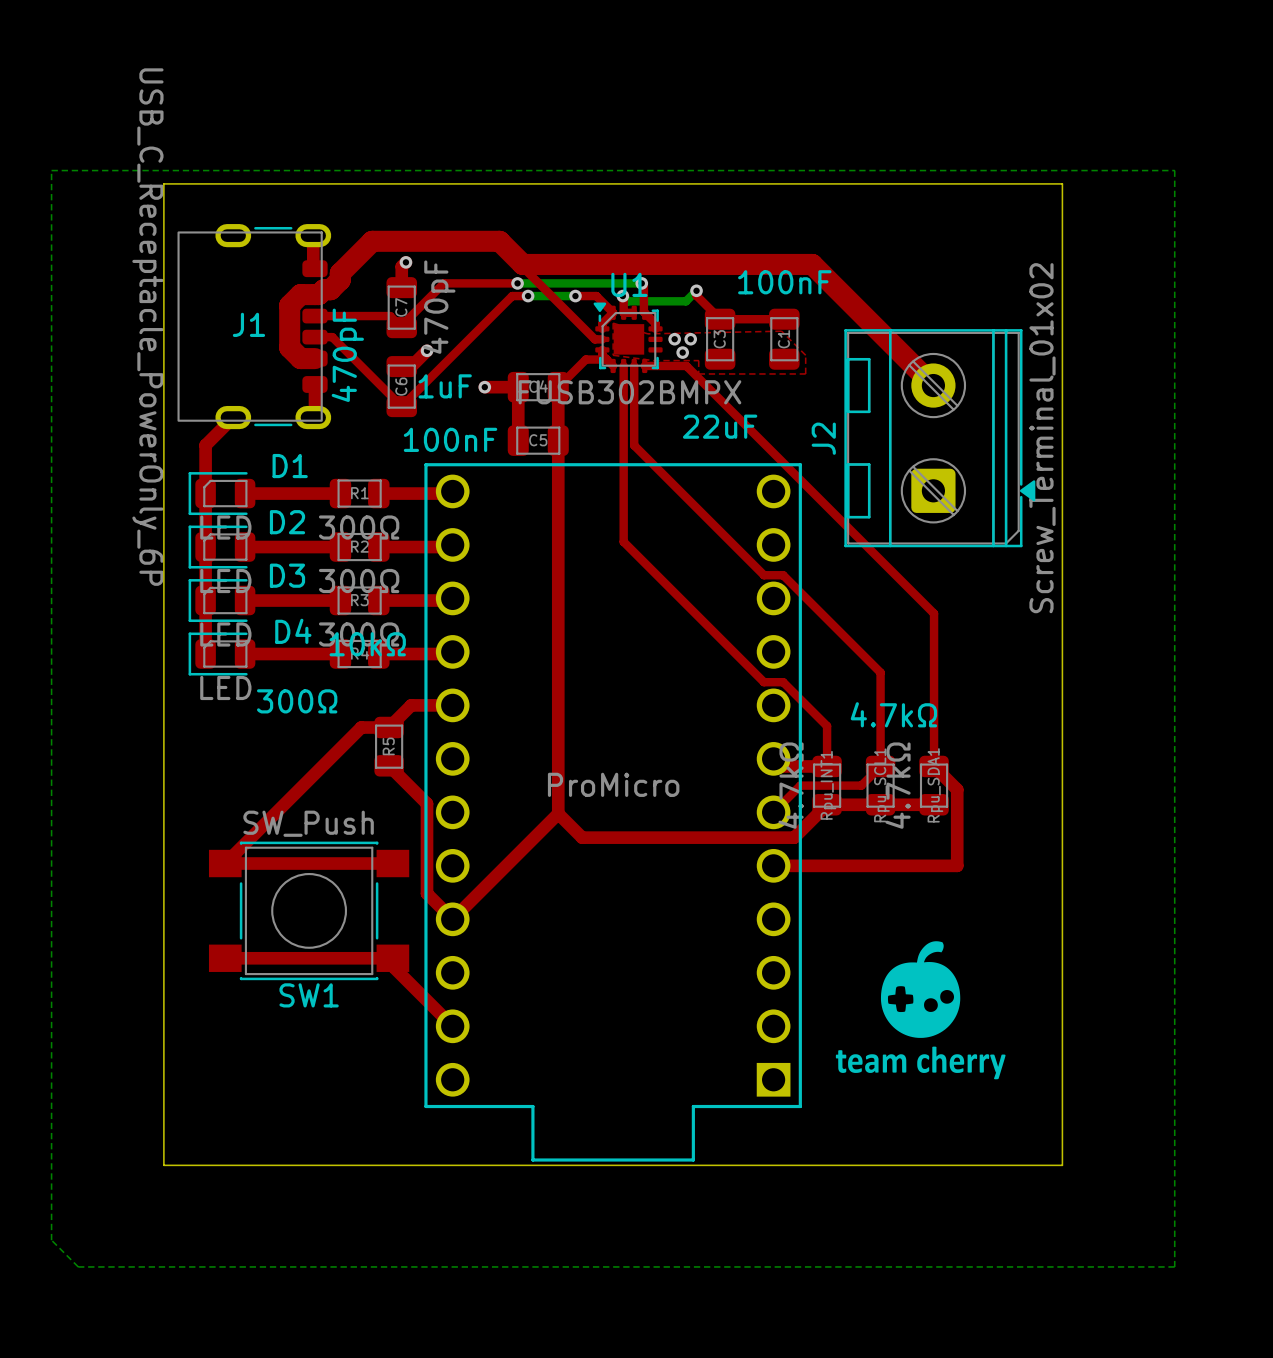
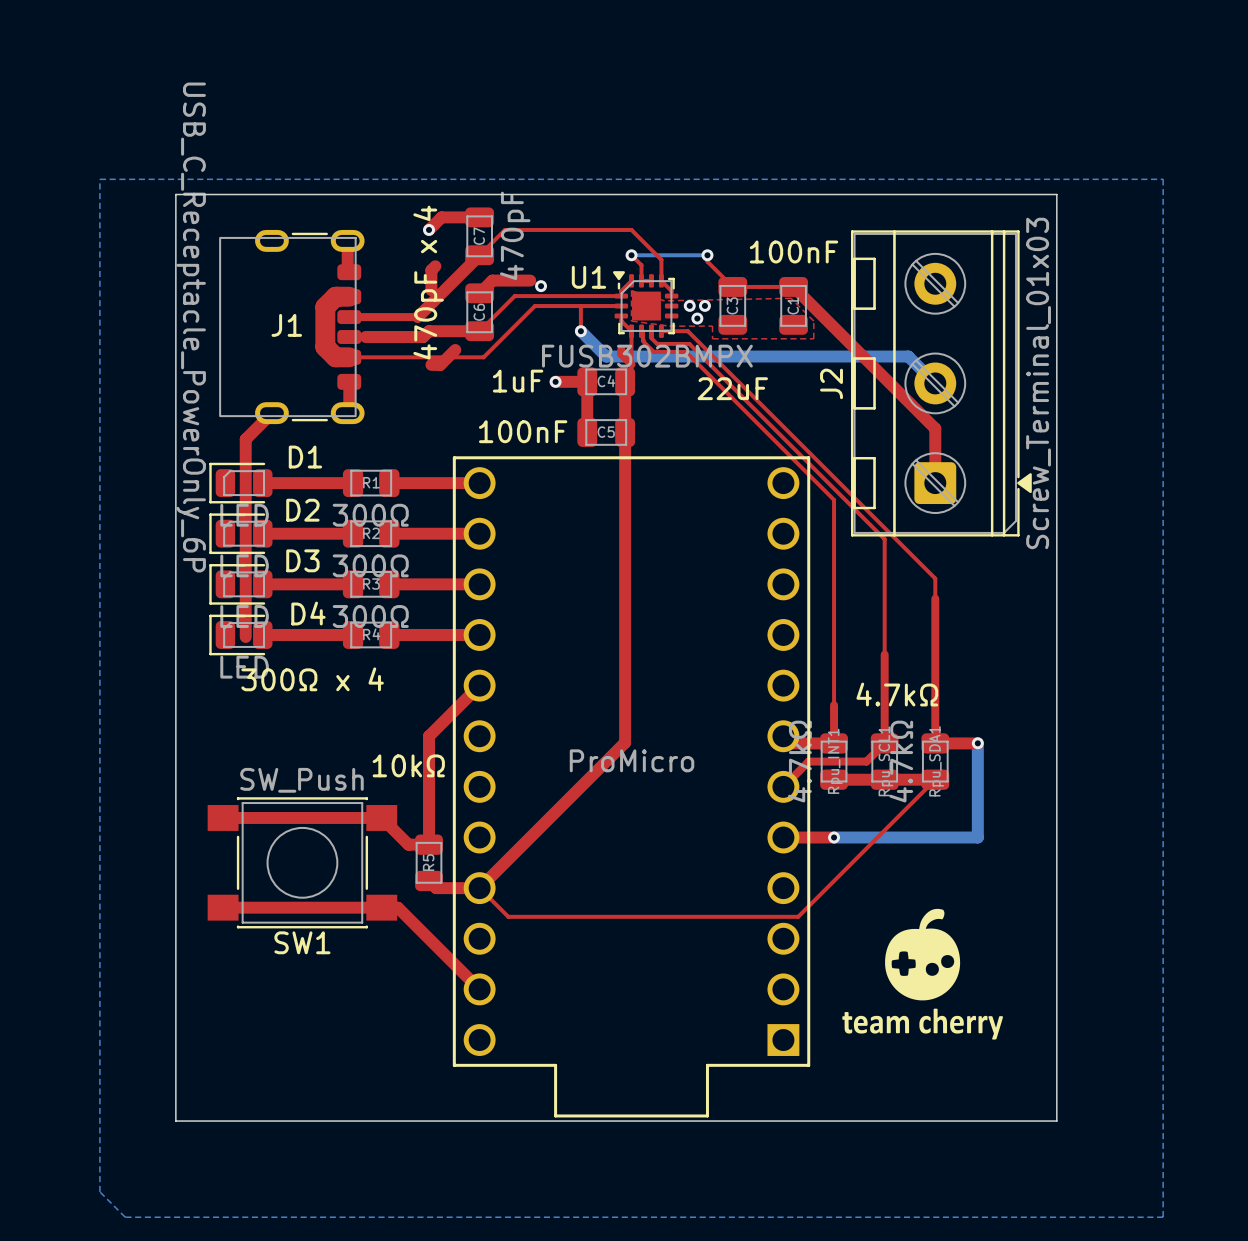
board edge: (1062, 186) (1062, 183) (163, 183) (163, 1165) -> (1056, 194) (175, 194) (175, 1121) (206, 1121)
top track: none -> (479, 217) (441, 217) (429, 229)
top track: none -> (631, 255) (641, 265) (641, 280) (651, 280)
bottom track: none -> (631, 255) (707, 255)
via: none -> (631, 255)
top track: none -> (707, 255) (707, 261) (732, 286) (793, 286) (935, 428) (935, 483)
via: none -> (707, 255)
via position: (405, 262) -> (429, 229)
top track: (522, 264) (522, 267) (594, 339) (602, 339) -> none
top track: (522, 264) (499, 241) (372, 241) (340, 273) (340, 279) (330, 289) (323, 289) (318, 294) (314, 294) -> none
top track: (522, 264) (812, 264) (934, 386) -> none
top track: none -> (530, 280) (492, 280) (479, 293)
top track: (517, 283) (443, 283) (401, 327) (390, 316) (387, 316) -> (671, 296) (671, 291) (661, 280) (661, 259) (631, 229) (504, 229) (417, 317)
bottom track: (517, 283) (641, 283) -> none
top track: (641, 283) (643, 285) (643, 311) (655, 323) (655, 328) -> none
via: (641, 283) -> none
U1 name position: U1 (629, 284) -> U1 (588, 277)
top track: (696, 290) (696, 295) (720, 319) (784, 319) -> none
bottom track: (696, 290) (686, 301) (628, 301) (622, 296) -> none
via: (696, 290) -> none
top track: (528, 296) (512, 296) (401, 406) (332, 337) -> (631, 280) (621, 291) (621, 296) (514, 296) (479, 331) (429, 331) (423, 336) (365, 336)
bottom track: (528, 296) (575, 296) -> none
via: (528, 296) -> none
top track: (575, 296) (596, 296) (613, 312) (602, 323) (602, 328) -> none
via: (575, 296) -> none
via: (622, 296) -> none
top track: none -> (580, 306) (580, 331)
top track: none -> (621, 306) (534, 306) (483, 357) (349, 357)
via: none -> (689, 305)
via: none -> (704, 305)
C7 position: (401, 307) -> (479, 236)
top track: none -> (621, 316) (621, 320) (631, 331) (631, 375) (625, 381) (625, 742) (579, 788)
via: none -> (697, 318)
top zone outline: (613, 323) (613, 355) (653, 360) (698, 360) (698, 373) (805, 373) (805, 355) (781, 331) (647, 333) (613, 323) -> (631, 290) (631, 321) (669, 326) (712, 326) (712, 338) (813, 338) (813, 321) (791, 298) (664, 300) (631, 290)
J2 footprint: [844, 329, 1036, 548] -> [850, 230, 1032, 537]
bottom track: none -> (580, 331) (606, 356) (908, 356) (935, 383)
via: none -> (580, 331)
U1 position: (628, 337) -> (645, 304)
via: (674, 339) -> none
via: (690, 339) -> none
C3 position: (720, 339) -> (732, 305)
C1 position: (784, 339) -> (793, 305)
via: (427, 350) -> none
via: (682, 352) -> none
C6 value: 470pF (347, 355) -> 470pF x 4 (428, 282)
top track: (606, 359) (585, 359) (558, 387) (558, 813) (582, 837) (794, 837) (827, 804) -> none
top track: (623, 365) (623, 541) (764, 682) (783, 682) (827, 726) -> (641, 331) (643, 341) (653, 351) (686, 351) (834, 499) (834, 705)
top track: (634, 365) (634, 445) (764, 575) (783, 575) (880, 672) -> (651, 331) (651, 338) (657, 343) (689, 343) (884, 539) (884, 654)
top track: (644, 365) (686, 365) (934, 613) -> (661, 331) (687, 331) (935, 578) (935, 598)
via: none -> (555, 381)
C6 position: (401, 386) -> (479, 312)
top track: (484, 387) (518, 387) (518, 440) -> (555, 381) (587, 381) (587, 432)
via: (484, 387) -> none
C4 position: (538, 387) -> (606, 381)
J2 value: Screw_Terminal_01x02 (1042, 438) -> Screw_Terminal_01x03 (1038, 383)
C5 position: (538, 440) -> (606, 432)
top track: (452, 491) (450, 493) (378, 493) -> (479, 483) (389, 483)
D1 position: (221, 493) -> (240, 483)
top track: (245, 493) (340, 493) -> (262, 483) (353, 483)
R1 position: (359, 493) -> (371, 483)
top track: (452, 544) (450, 547) (378, 547) -> (479, 533) (389, 533)
D2 position: (221, 547) -> (240, 533)
top track: (245, 547) (340, 547) -> (262, 533) (353, 533)
R2 position: (359, 547) -> (371, 533)
top track: (452, 598) (450, 600) (378, 600) -> (479, 584) (389, 584)
D3 position: (221, 600) -> (240, 584)
top track: (245, 600) (340, 600) -> (262, 584) (353, 584)
R3 position: (359, 600) -> (371, 584)
top track: (452, 651) (450, 654) (378, 654) -> (479, 634) (389, 634)
D4 position: (221, 654) -> (240, 634)
top track: (245, 654) (340, 654) -> (262, 634) (353, 634)
R4 position: (359, 654) -> (371, 634)
R4 value: 300Ω (297, 701) -> 300Ω x 4 (312, 679)
top track: (452, 705) (411, 705) (389, 727) (361, 727) (225, 863) (392, 863) -> (479, 685) (429, 736) (429, 844) (408, 844) (381, 817) (223, 817)
R5 position: (389, 746) -> (429, 862)
top track: (389, 765) (427, 803) (427, 893) (452, 919) -> none
top track: (934, 766) (957, 789) (957, 865) (827, 865) -> (935, 743) (977, 743)
bottom track: none -> (977, 743) (977, 837) (834, 837)
via: none -> (977, 743)
top track: none -> (935, 779) (798, 916) (508, 916) (479, 888) (436, 888) (429, 880)
via: none -> (834, 837)
SW1 position: (309, 910) -> (302, 862)
top track: (225, 958) (392, 958) (392, 966) -> (223, 907) (397, 907) (423, 932)

